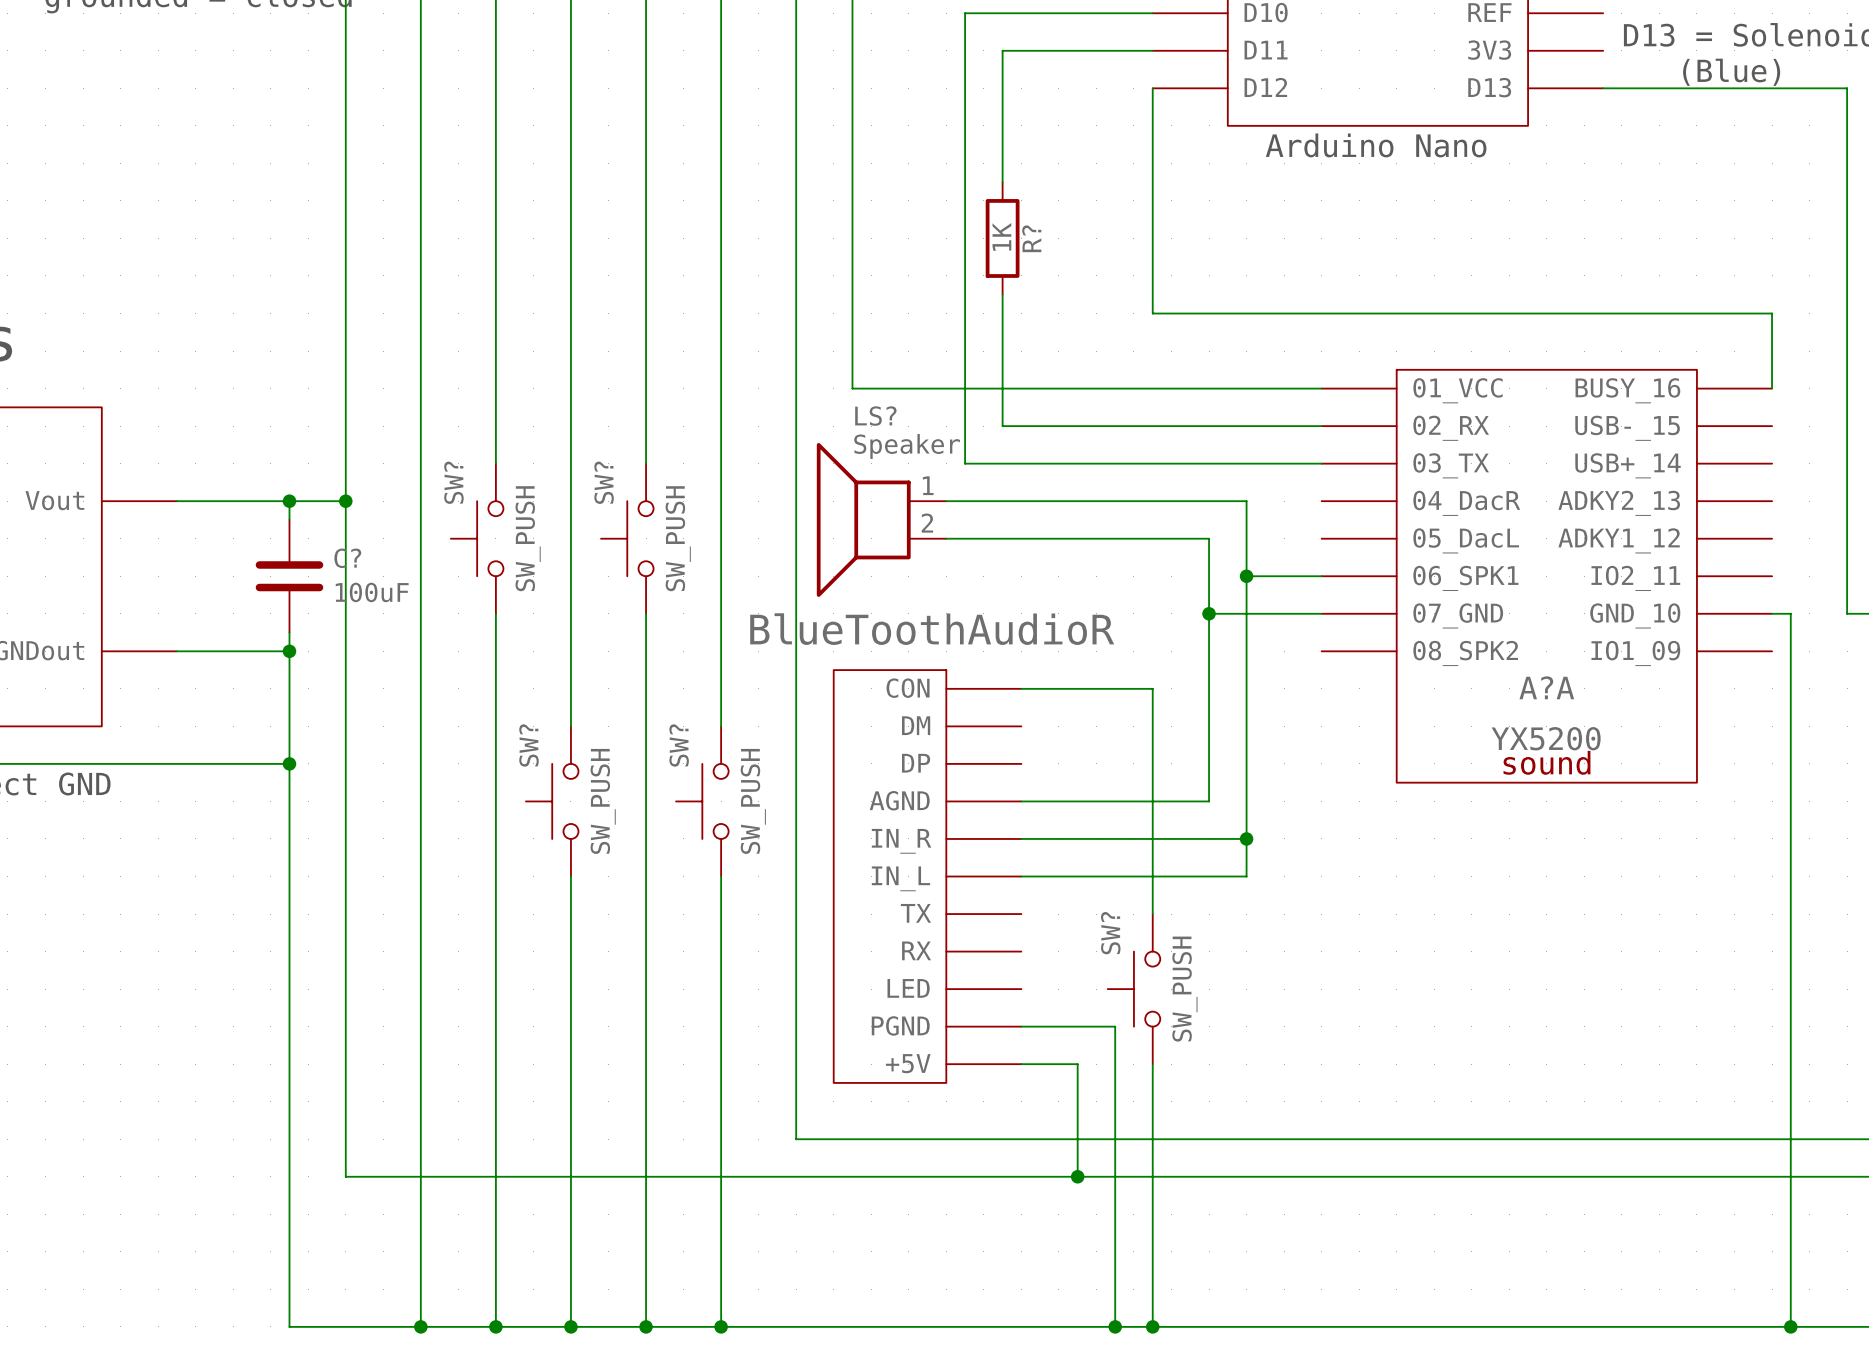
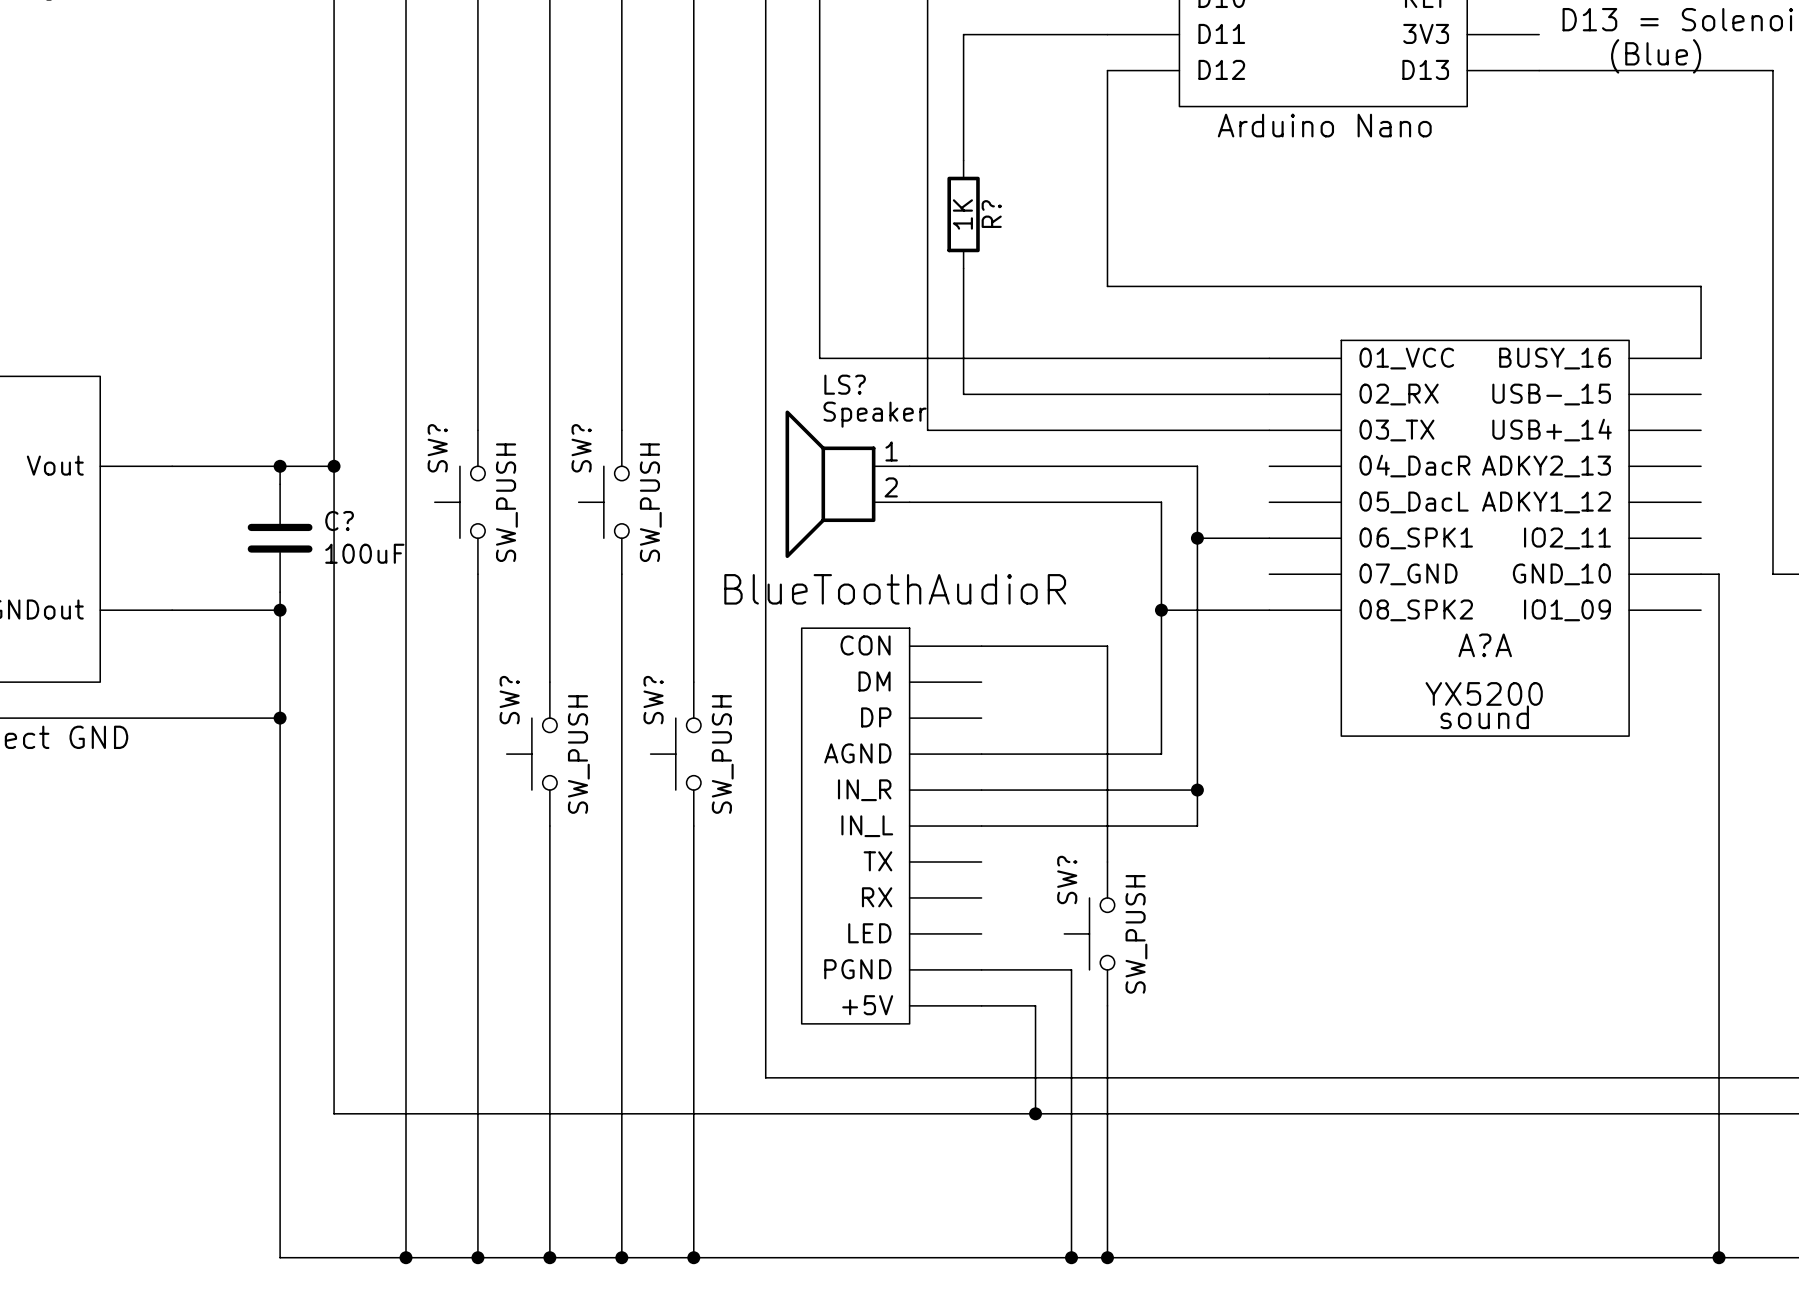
wire: (1209, 613) (1321, 613) -> (1161, 610) (1269, 610)
junction position: (1209, 613) -> (1161, 610)

